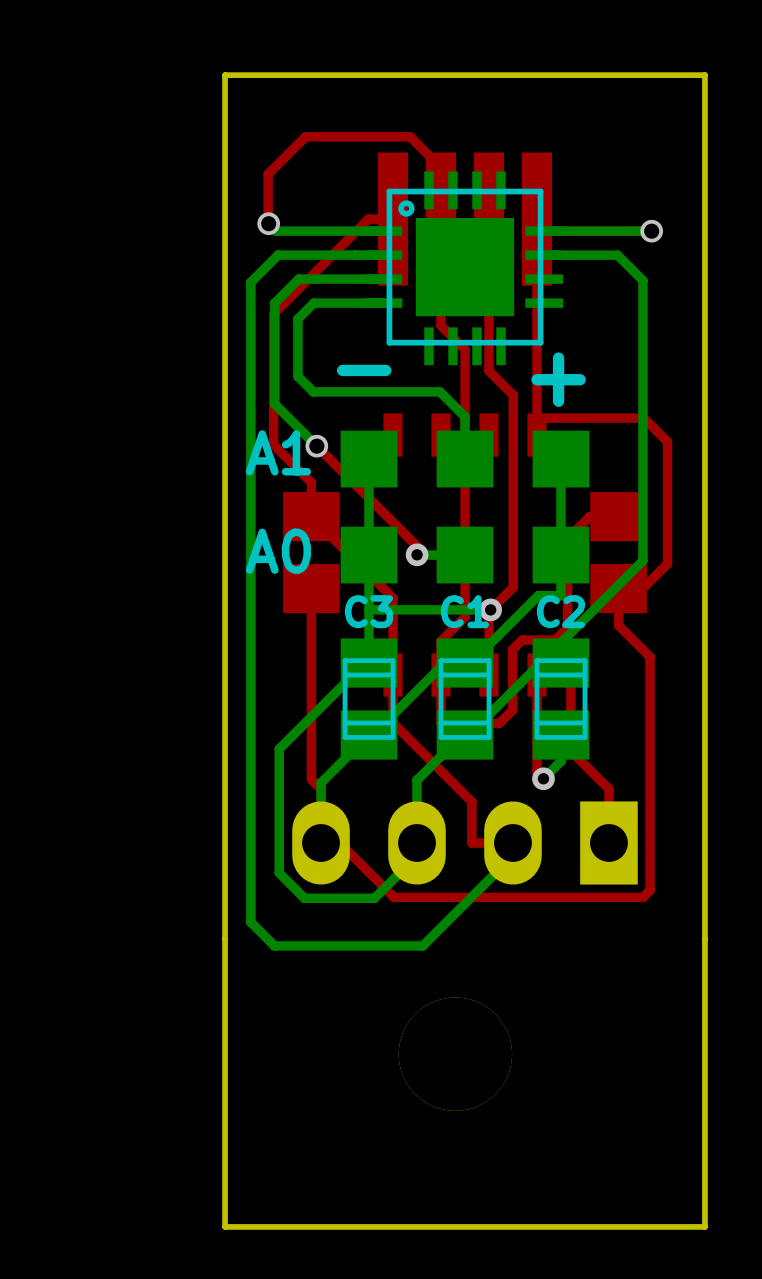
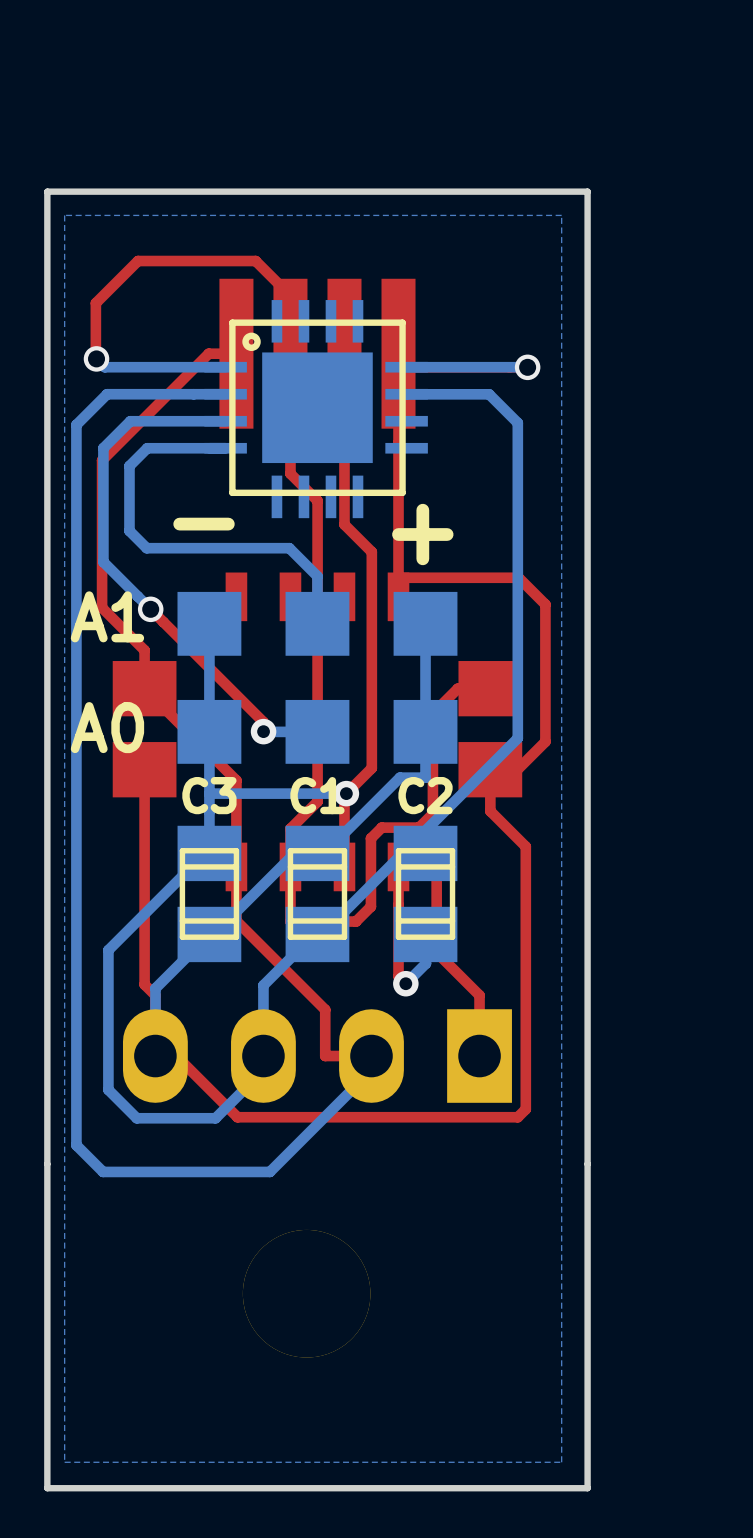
bottom zone outline: none -> (561, 215) (561, 1462) (64, 1462) (64, 215) (561, 215)

